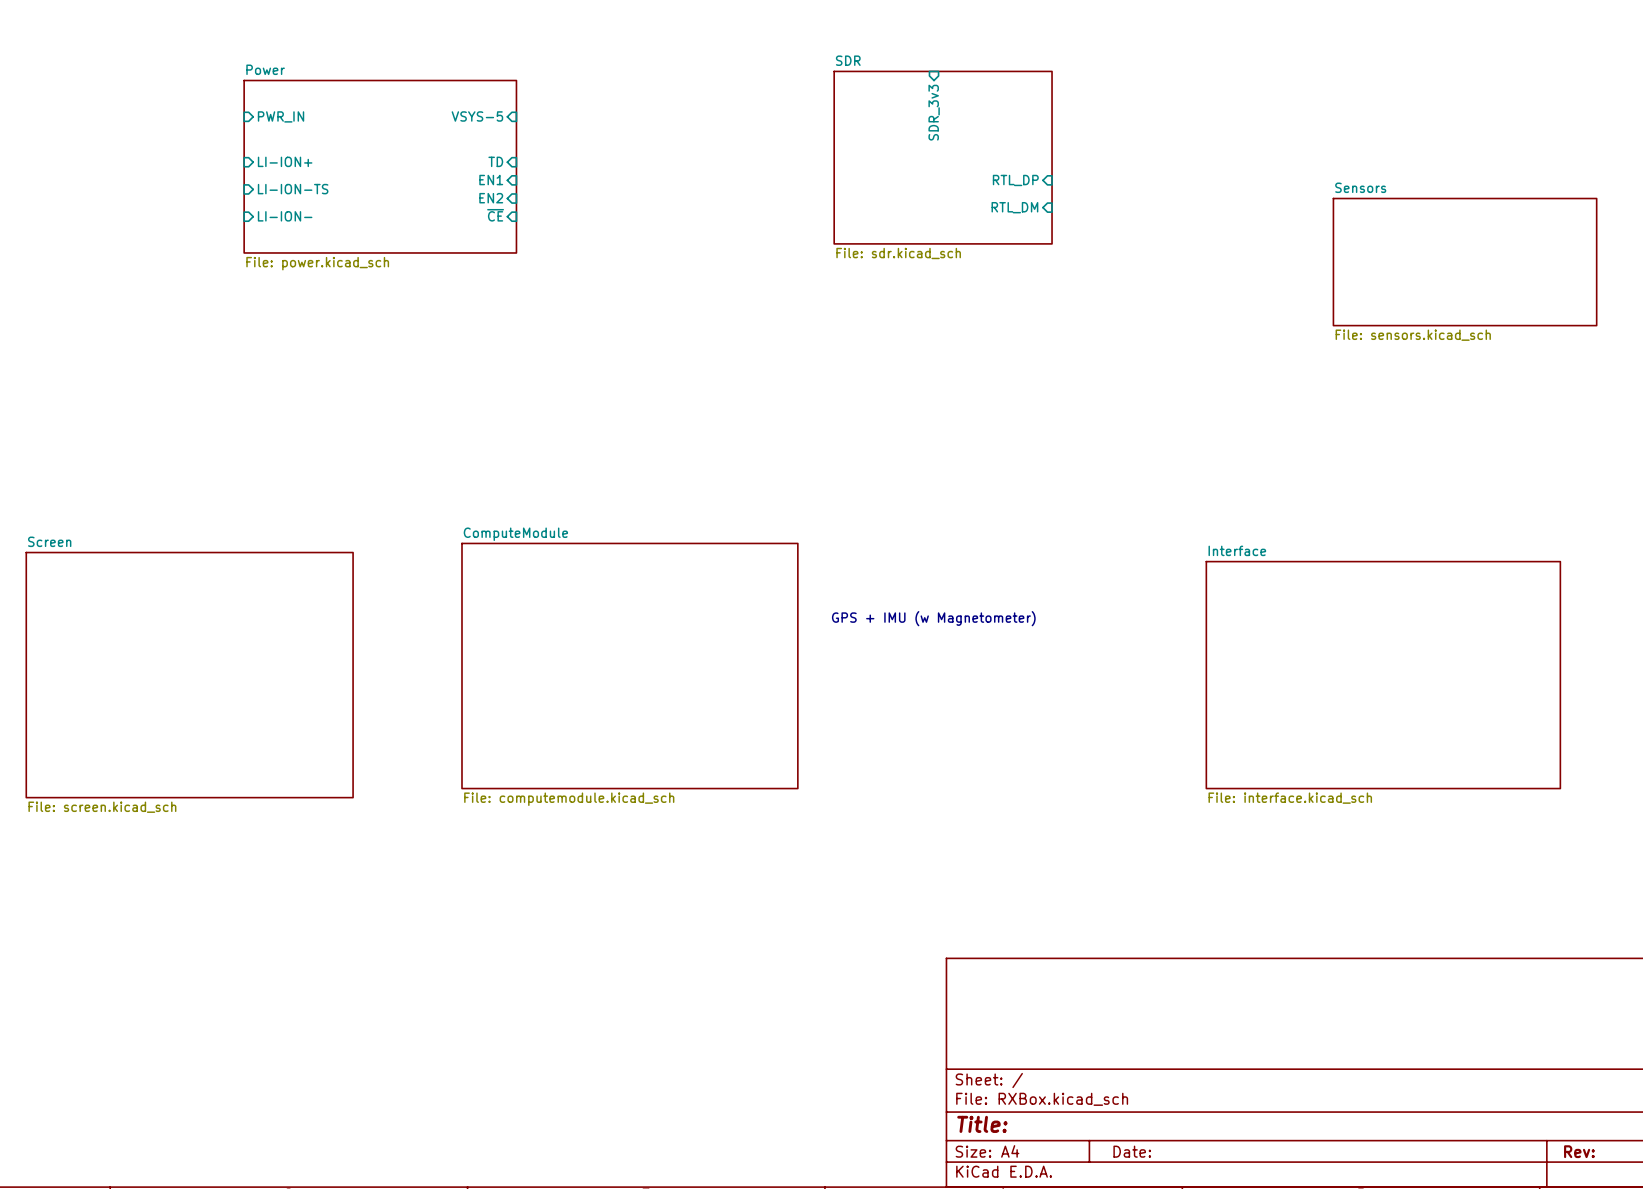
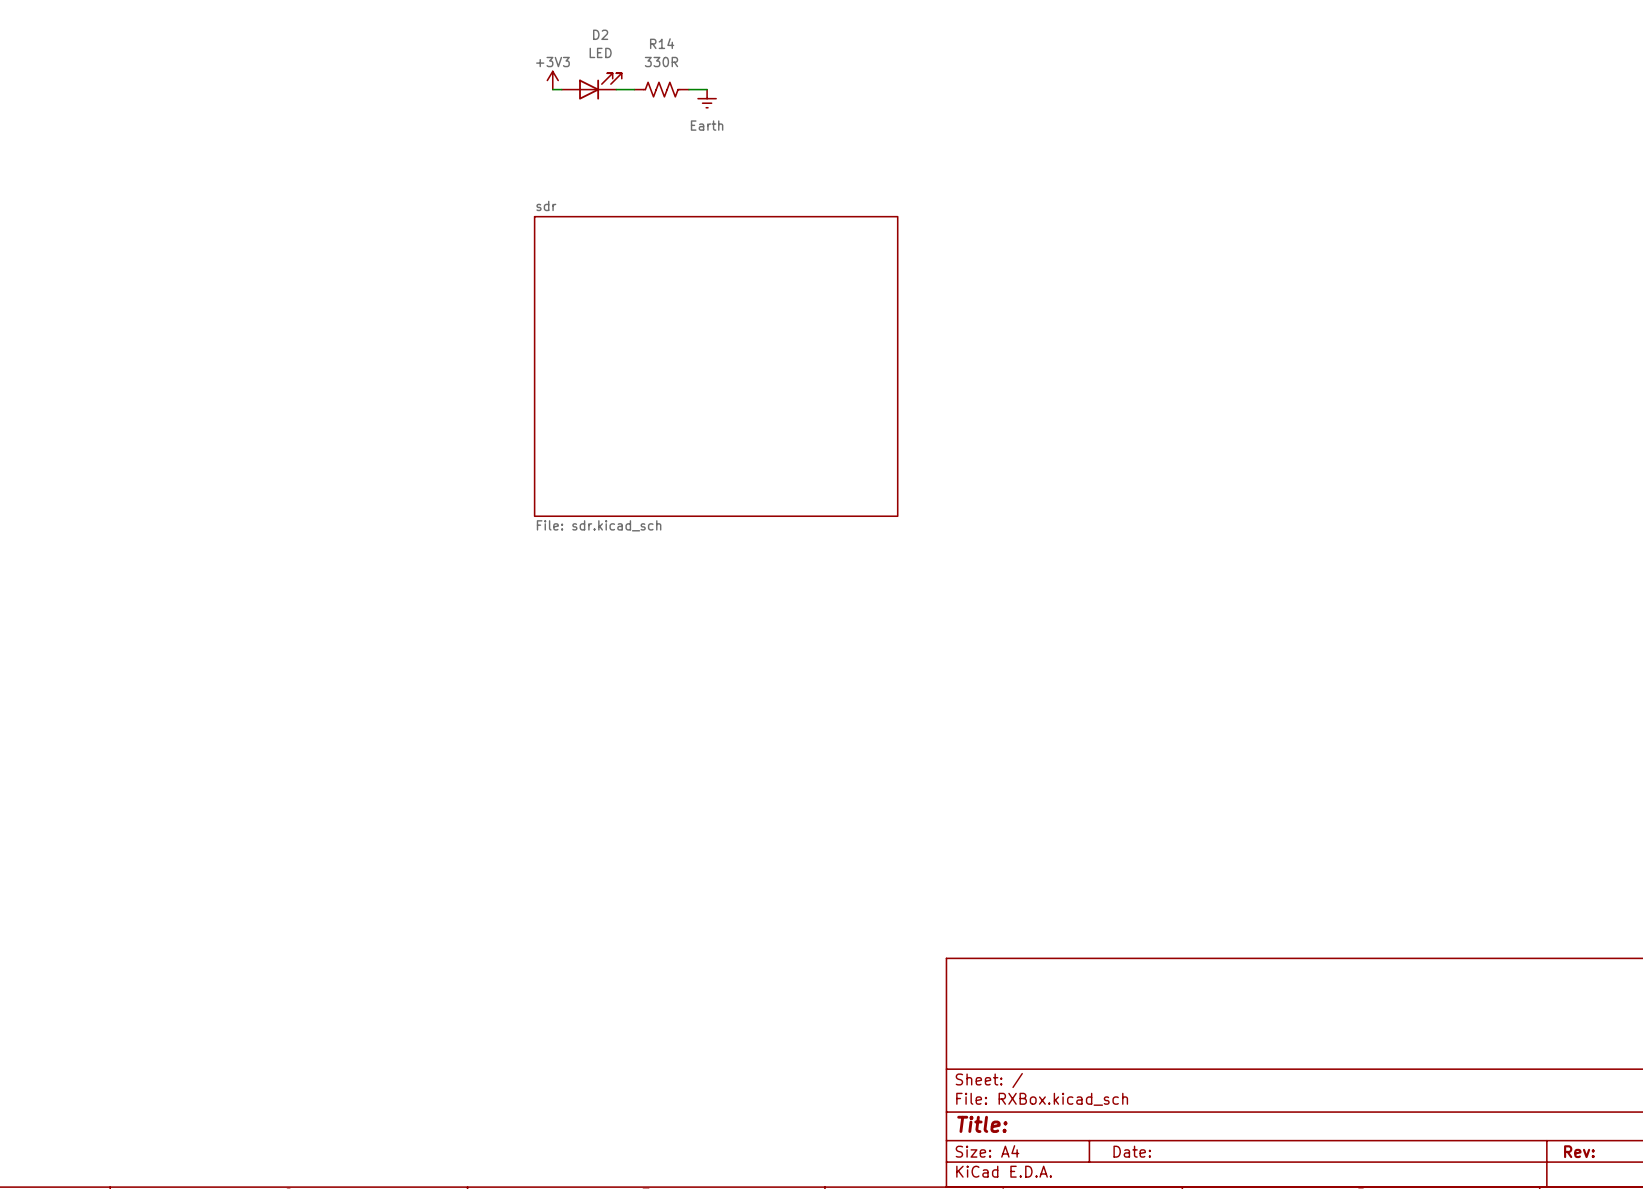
power symbol: none -> +3V3 (552, 80)
D2: none -> LED (591, 86)
wire: none -> (552, 89) (561, 89)
wire: none -> (616, 89) (634, 89)
R14: none -> 330R (661, 89)
wire: none -> (688, 89) (707, 89)
power symbol: none -> Earth (707, 98)
sheet pin: SDR_3v3 (934, 112) -> none
sheet pin: PWR_IN (281, 116) -> none
sheet pin: VSYS-5 (477, 116) -> none
sheet SDR: File: sdr.kicad_sch (943, 157) -> none
sheet pin: LI-ION+ (285, 161) -> none
sheet pin: TD (495, 161) -> none
sheet Power: File: power.kicad_sch (380, 166) -> none
sheet pin: EN1 (491, 180) -> none
sheet pin: RTL_DP (1015, 180) -> none
sheet pin: LI-ION-TS (293, 189) -> none
sheet pin: EN2 (491, 198) -> none
sheet pin: RTL_DM (1014, 207) -> none
sheet pin: ~{CE} (495, 215) -> none
sheet pin: LI-ION- (285, 216) -> none
sheet Sensors: File: sensors.kicad_sch (1465, 262) -> none
sheet sdr: none -> File: sdr.kicad_sch (716, 366)
text: GPS + IMU (w Magnetometer) (933, 618) -> none
sheet ComputeModule: File: computemodule.kicad_sch (629, 666) -> none
sheet Screen: File: screen.kicad_sch (189, 675) -> none
sheet Interface: File: interface.kicad_sch (1383, 675) -> none

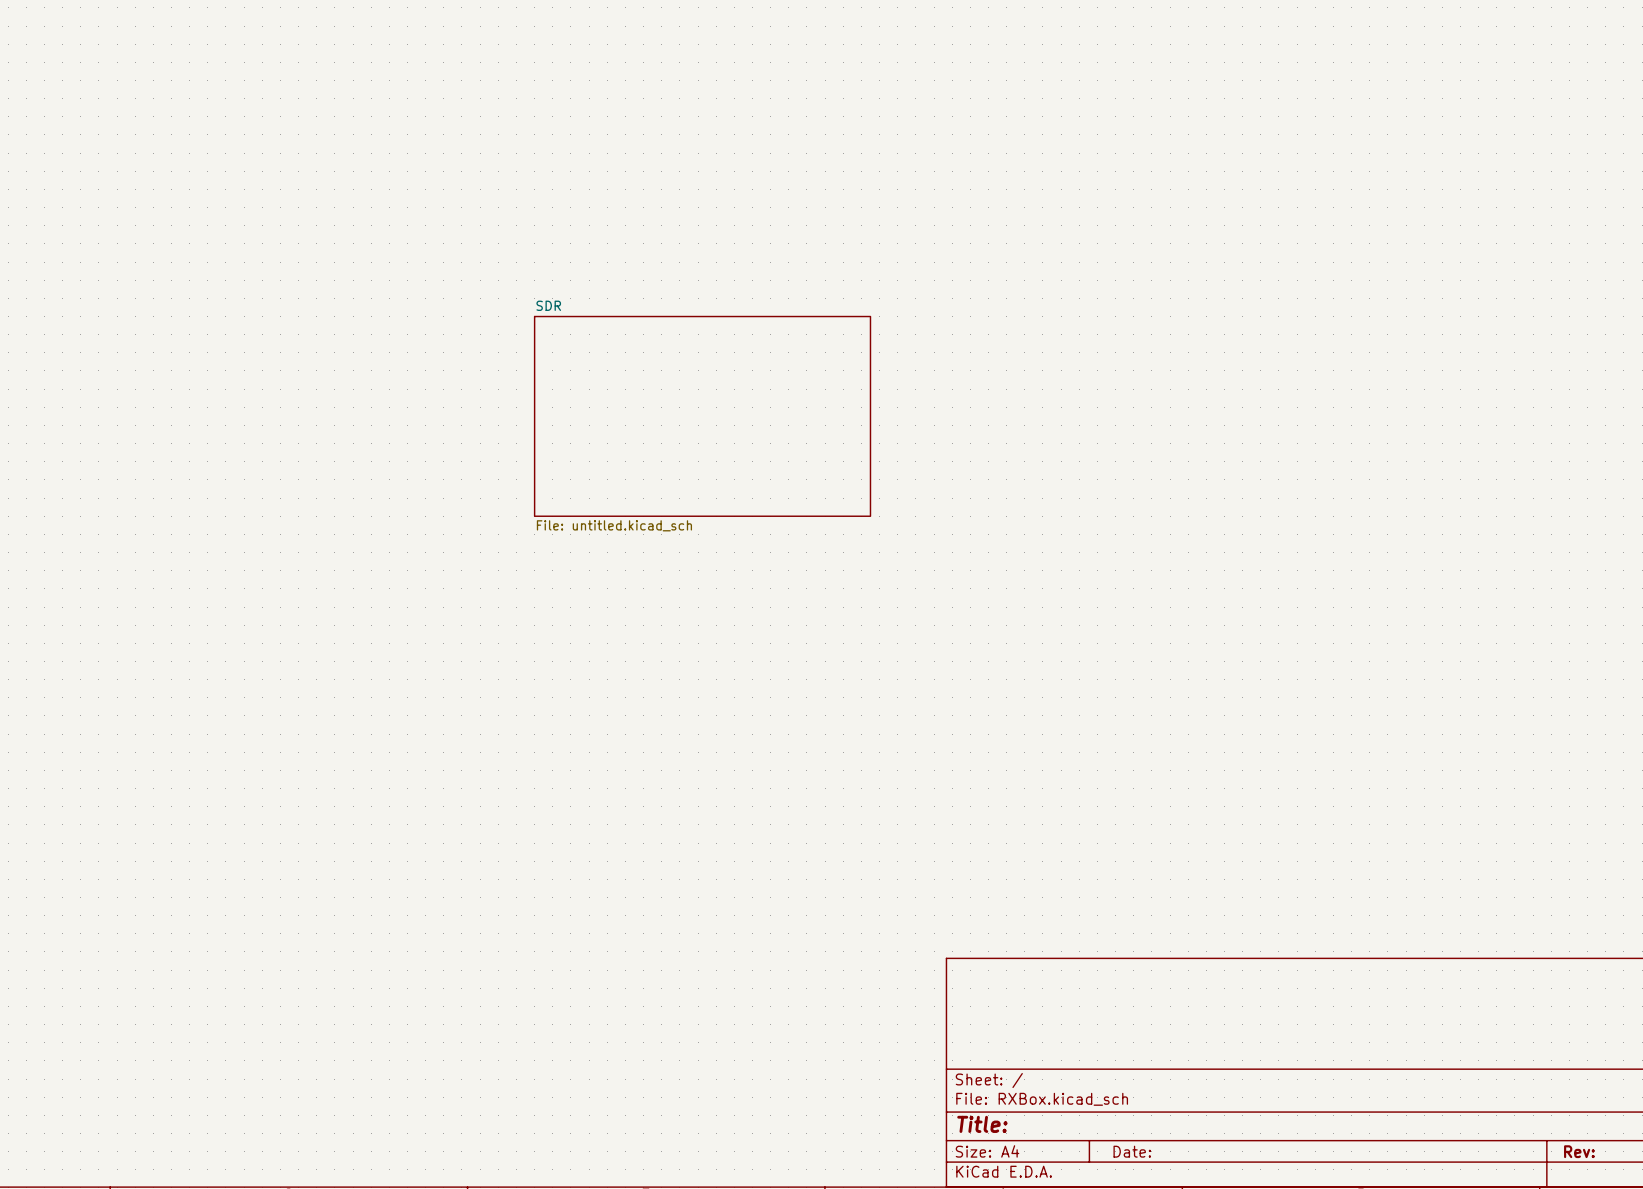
power symbol: +3V3 (552, 80) -> none
D2: LED (591, 86) -> none
wire: (552, 89) (561, 89) -> none
wire: (616, 89) (634, 89) -> none
R14: 330R (661, 89) -> none
wire: (688, 89) (707, 89) -> none
power symbol: Earth (707, 98) -> none
sheet sdr: File: sdr.kicad_sch (716, 366) -> none
sheet SDR: none -> File: untitled.kicad_sch (702, 416)

